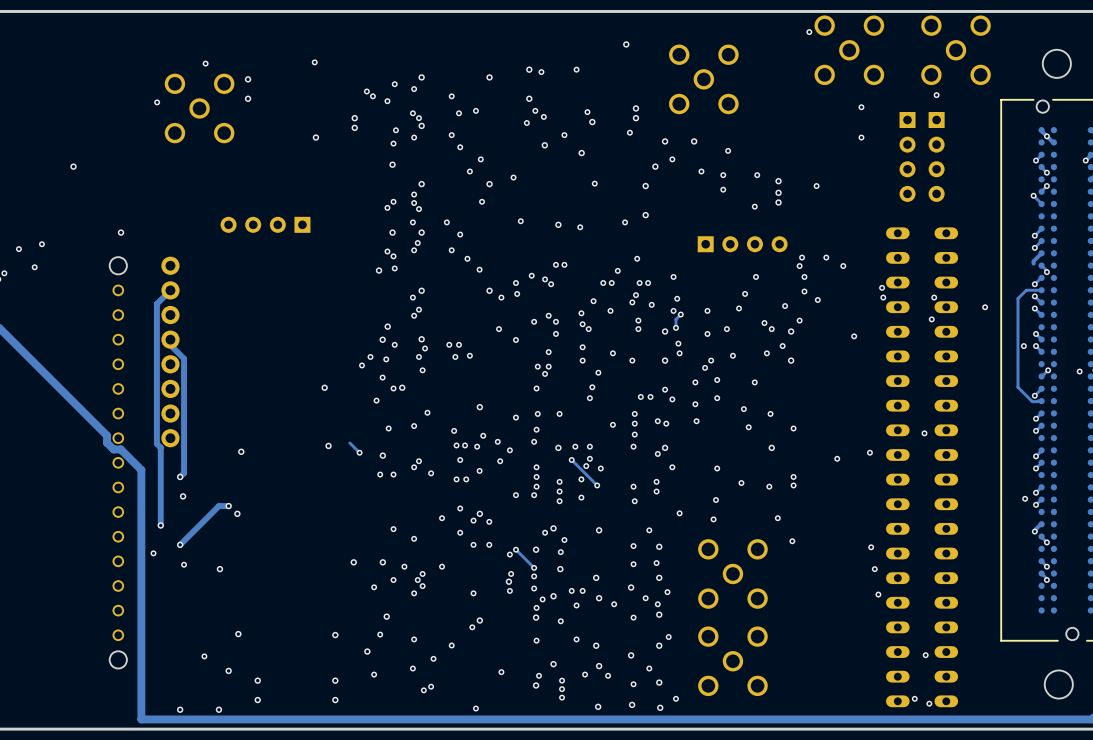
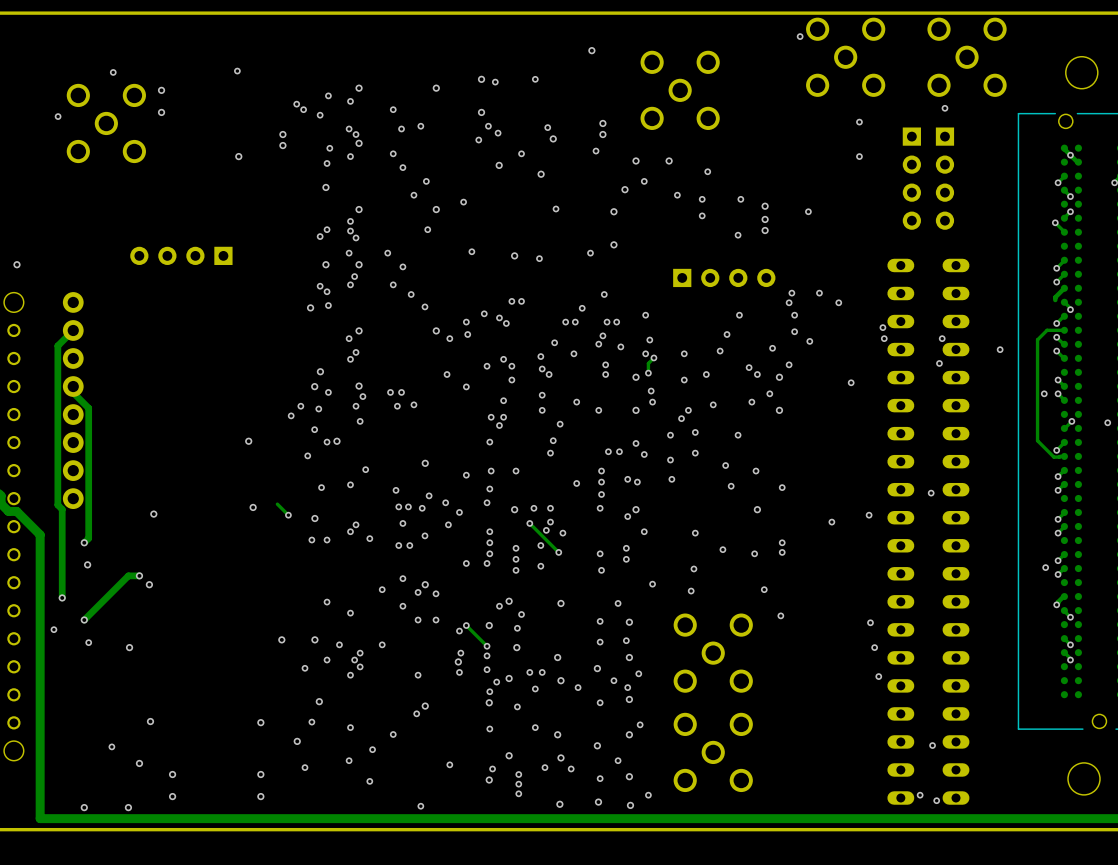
via: (423, 690) -> none

